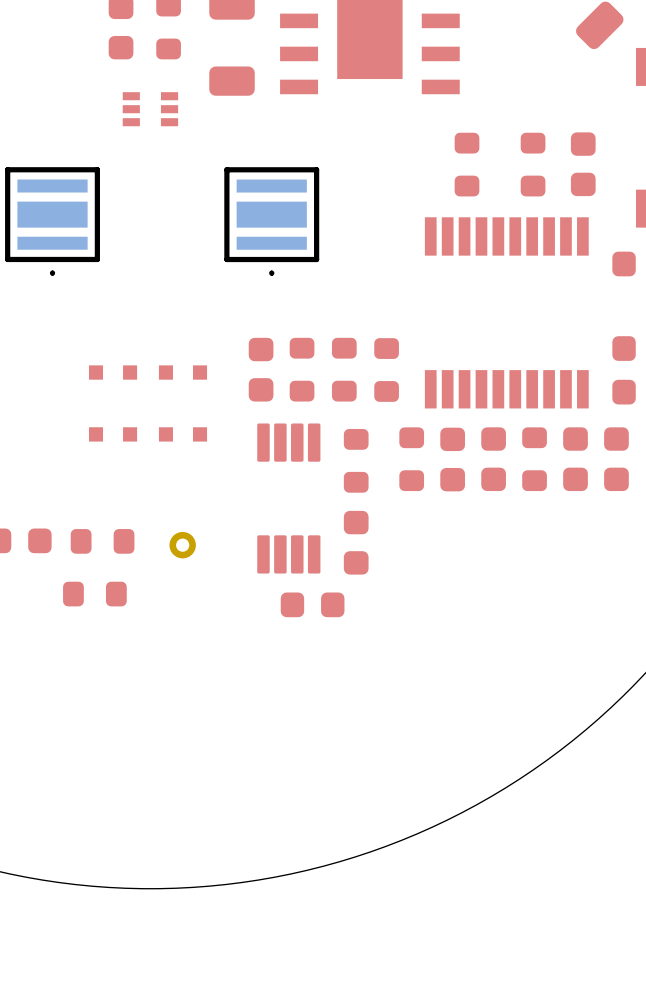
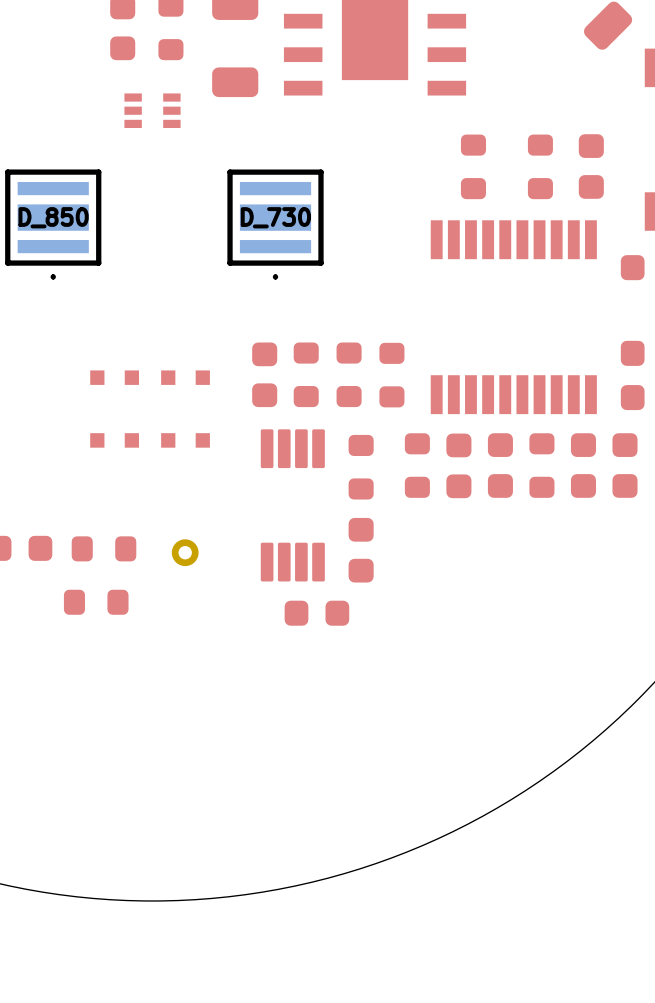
D_850 name: none -> D_850 (53, 217)
D_730 name: none -> D_730 (275, 217)

